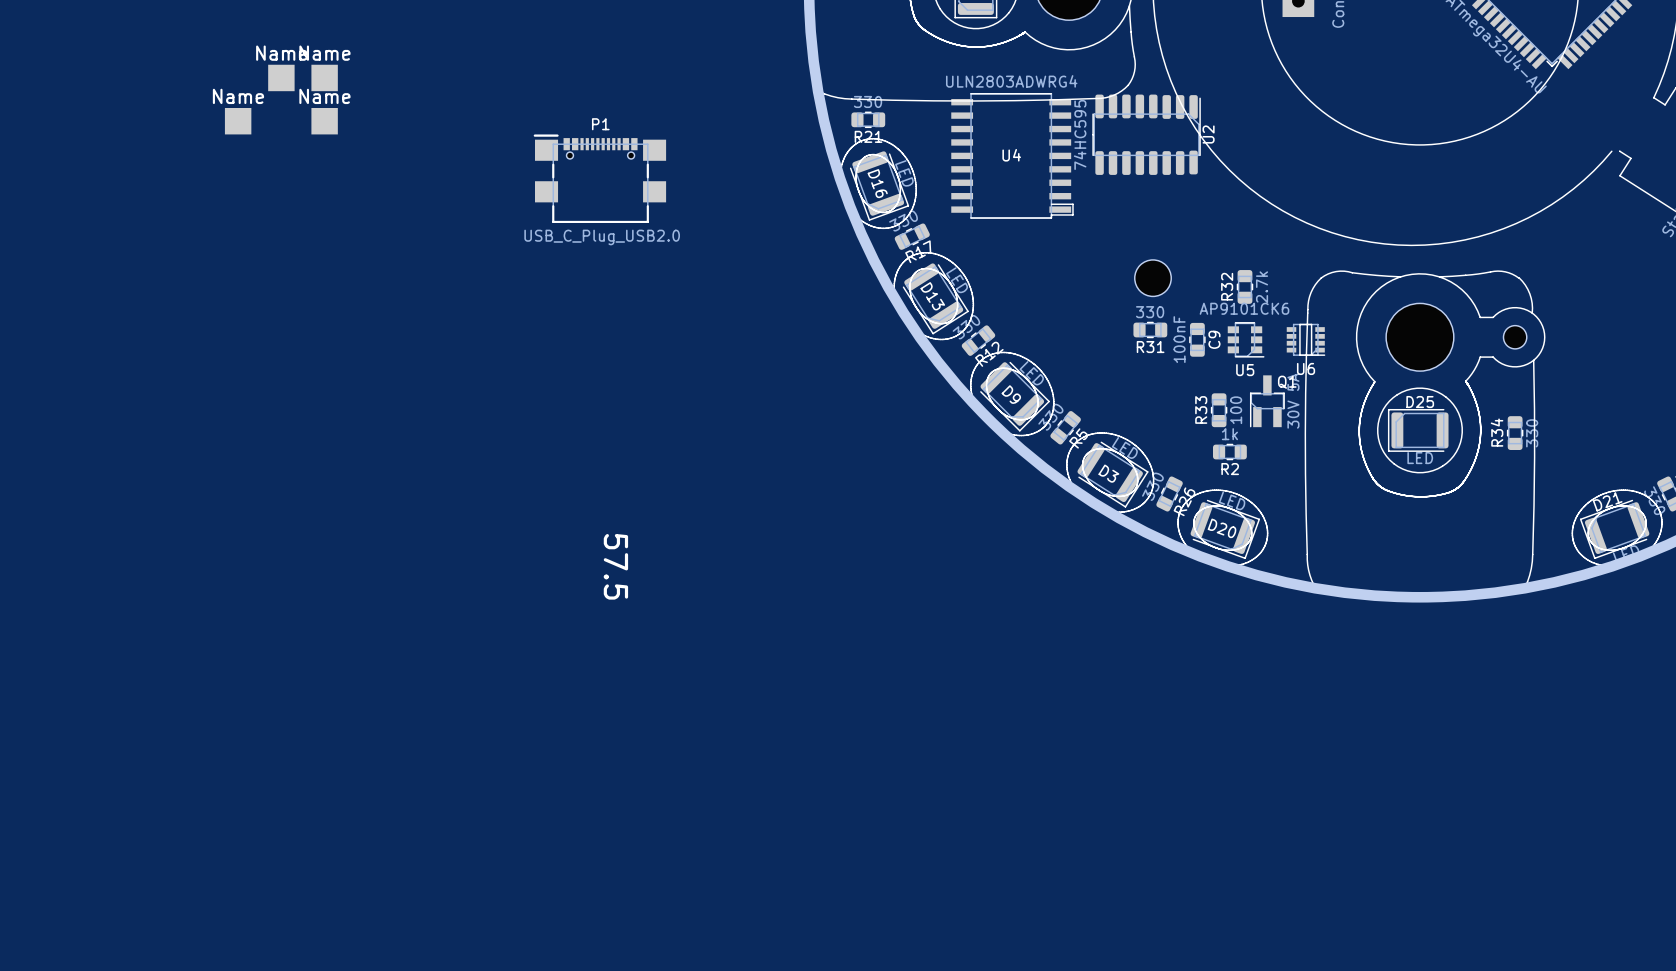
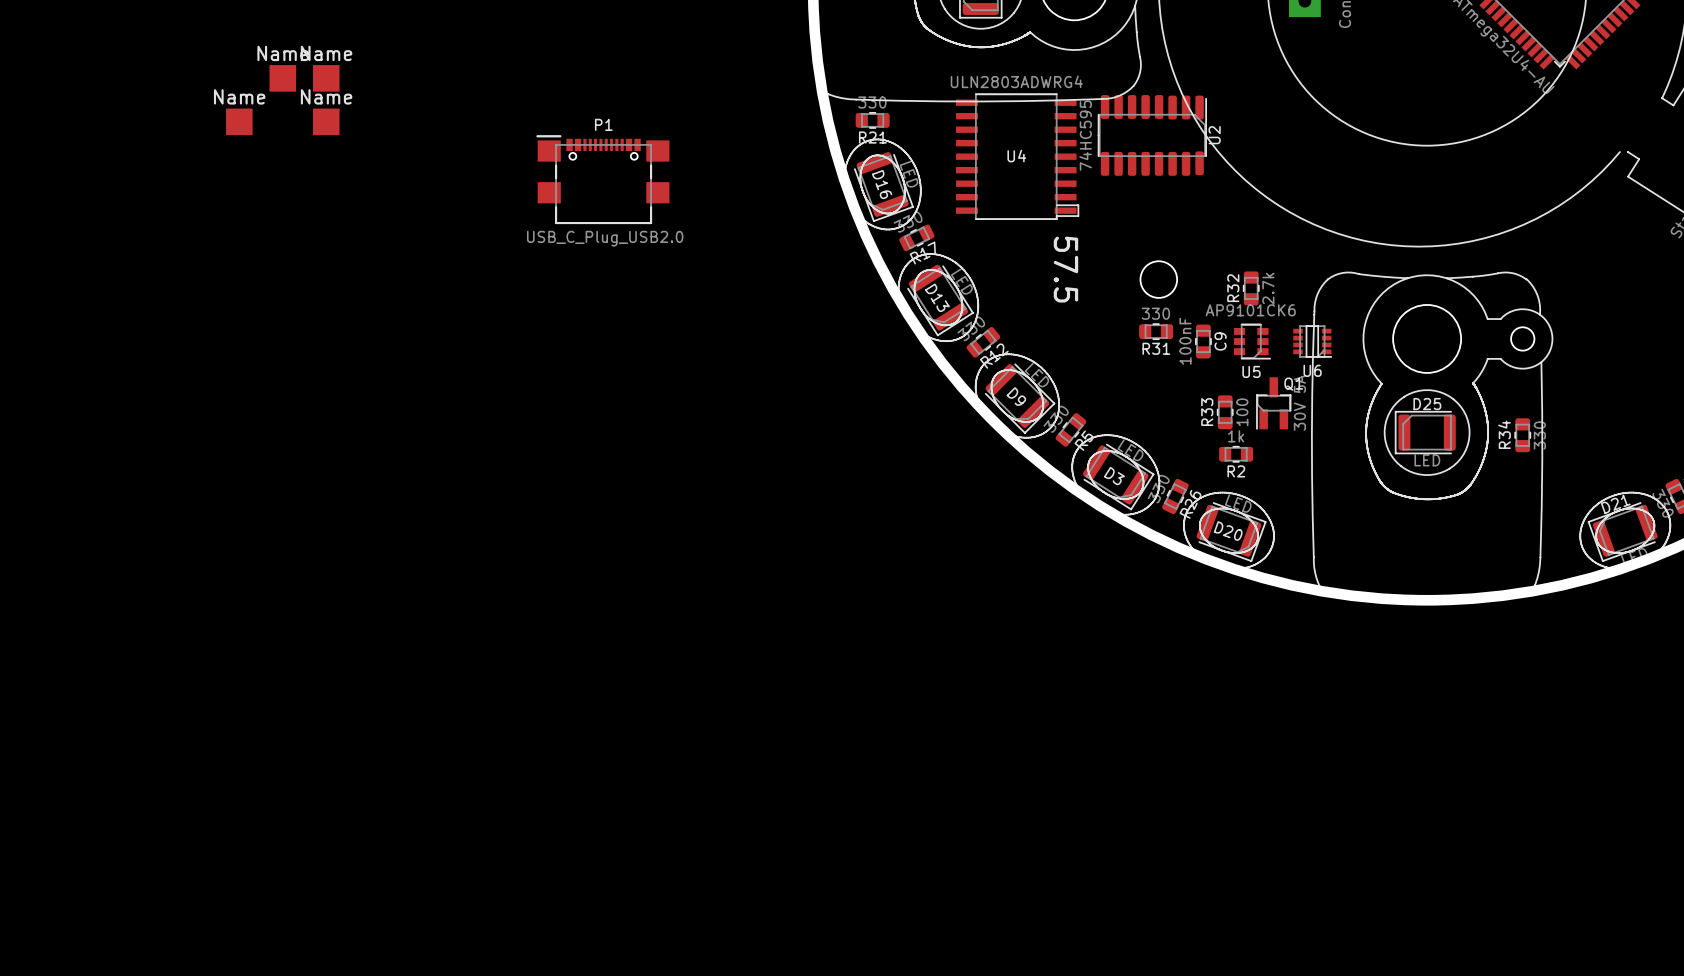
text: none -> 57.5 (1065, 269)
text: 57.5 (615, 566) -> none

